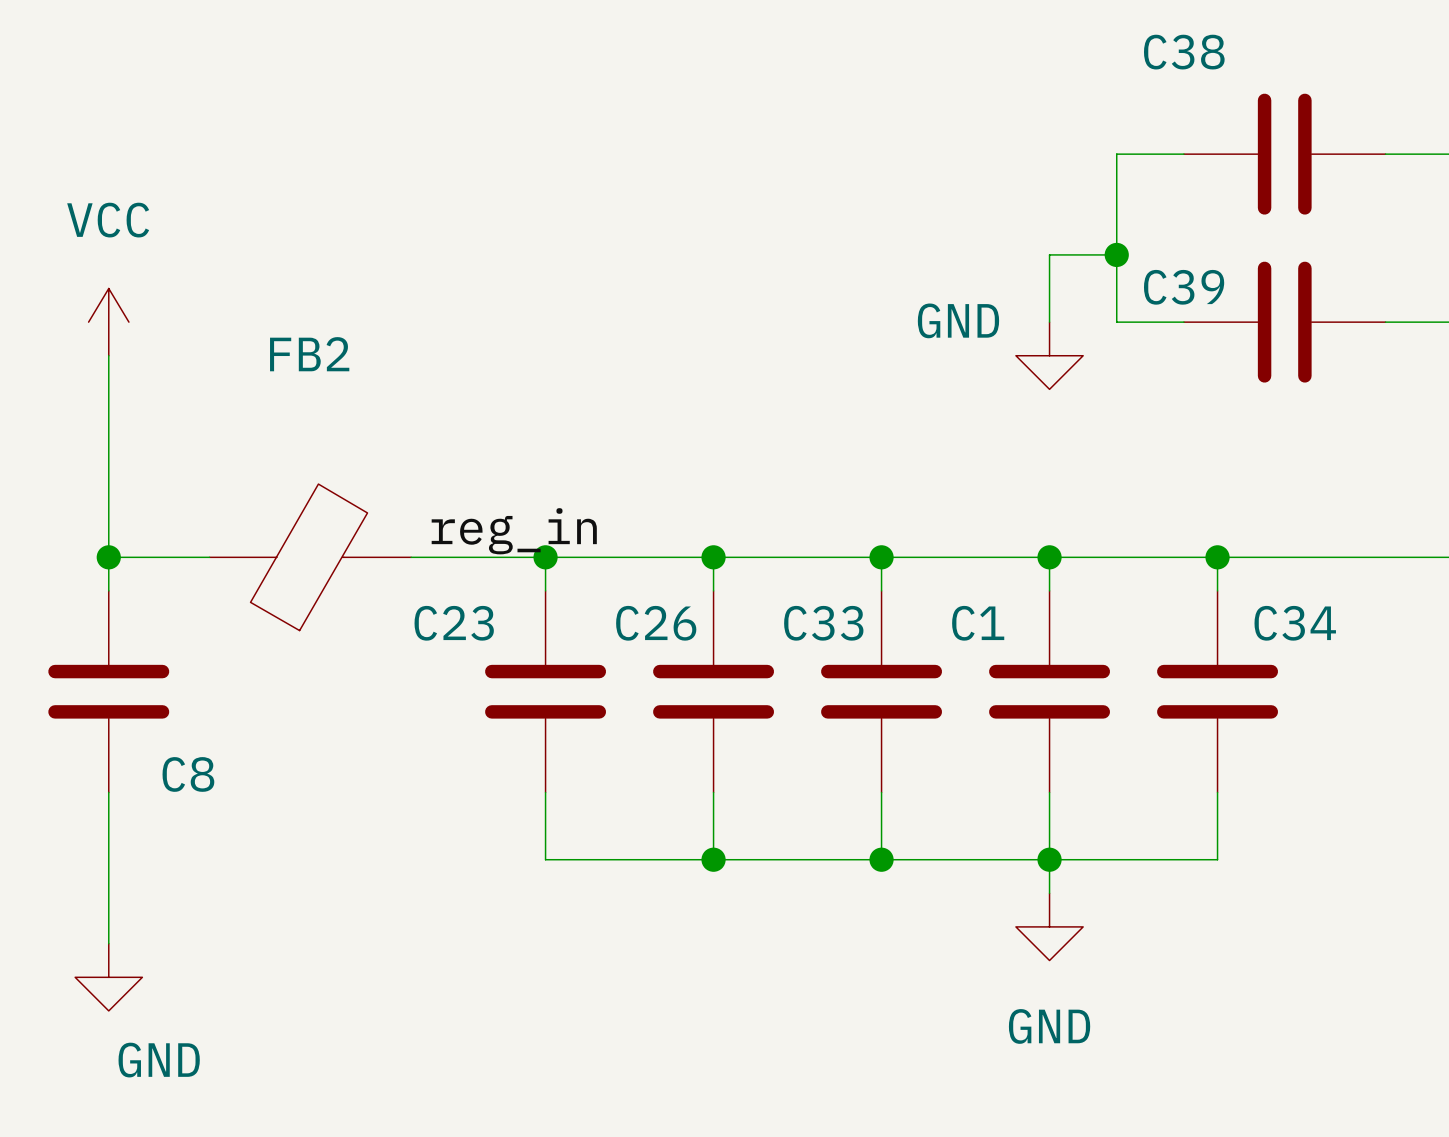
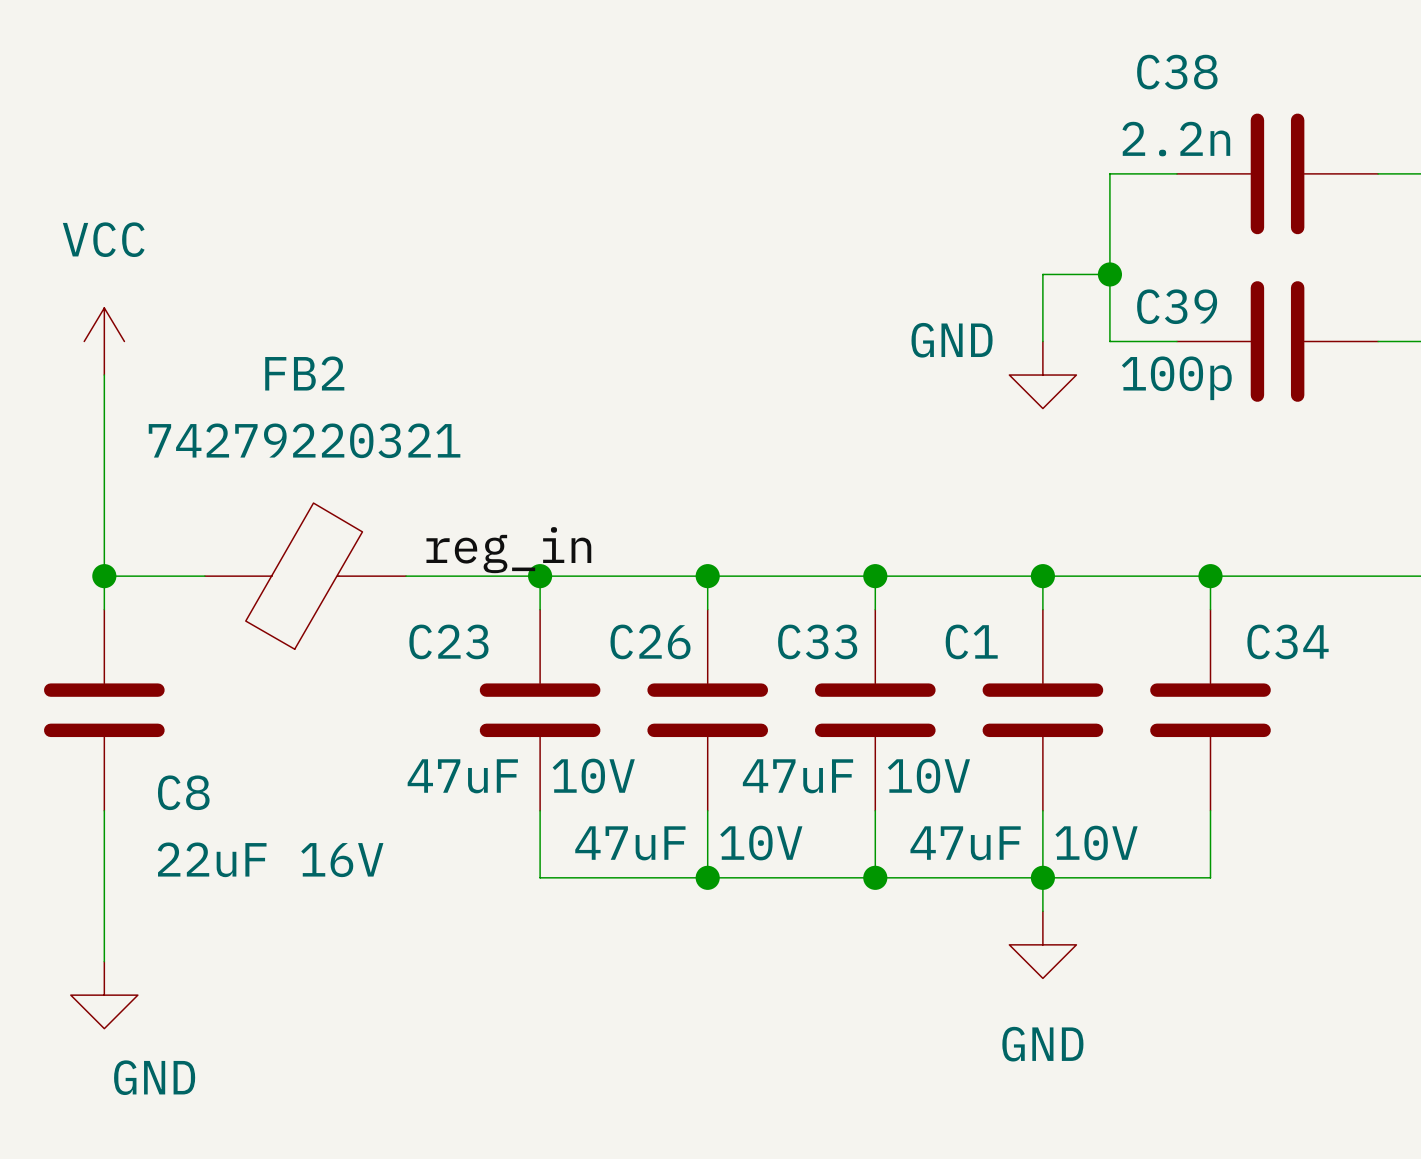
C38 value: none -> 2.2n (1176, 139)
C39 value: none -> 100p (1176, 378)
FB2 value: none -> 74279220321 (304, 440)
C23 value: none -> 47uF 10V (521, 776)
C33 value: none -> 47uF 10V (856, 776)
C26 value: none -> 47uF 10V (688, 843)
C1 value: none -> 47uF 10V (1024, 843)
C8 value: none -> 22uF 16V (270, 859)

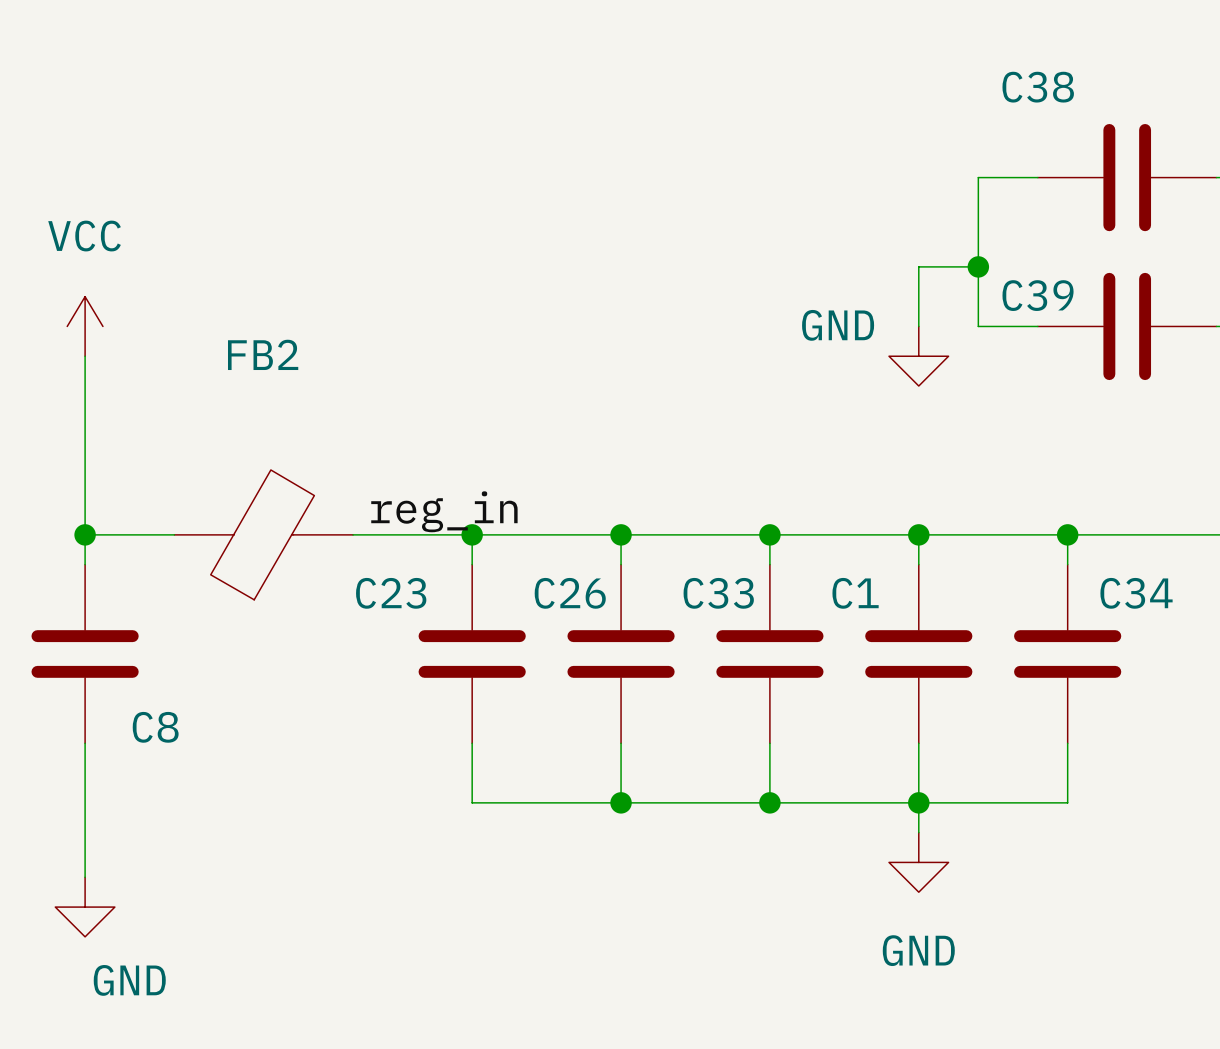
C38 value: 2.2n (1176, 139) -> none
C39 value: 100p (1176, 378) -> none
FB2 value: 74279220321 (304, 440) -> none
C23 value: 47uF 10V (521, 776) -> none
C33 value: 47uF 10V (856, 776) -> none
C26 value: 47uF 10V (688, 843) -> none
C1 value: 47uF 10V (1024, 843) -> none
C8 value: 22uF 16V (270, 859) -> none

